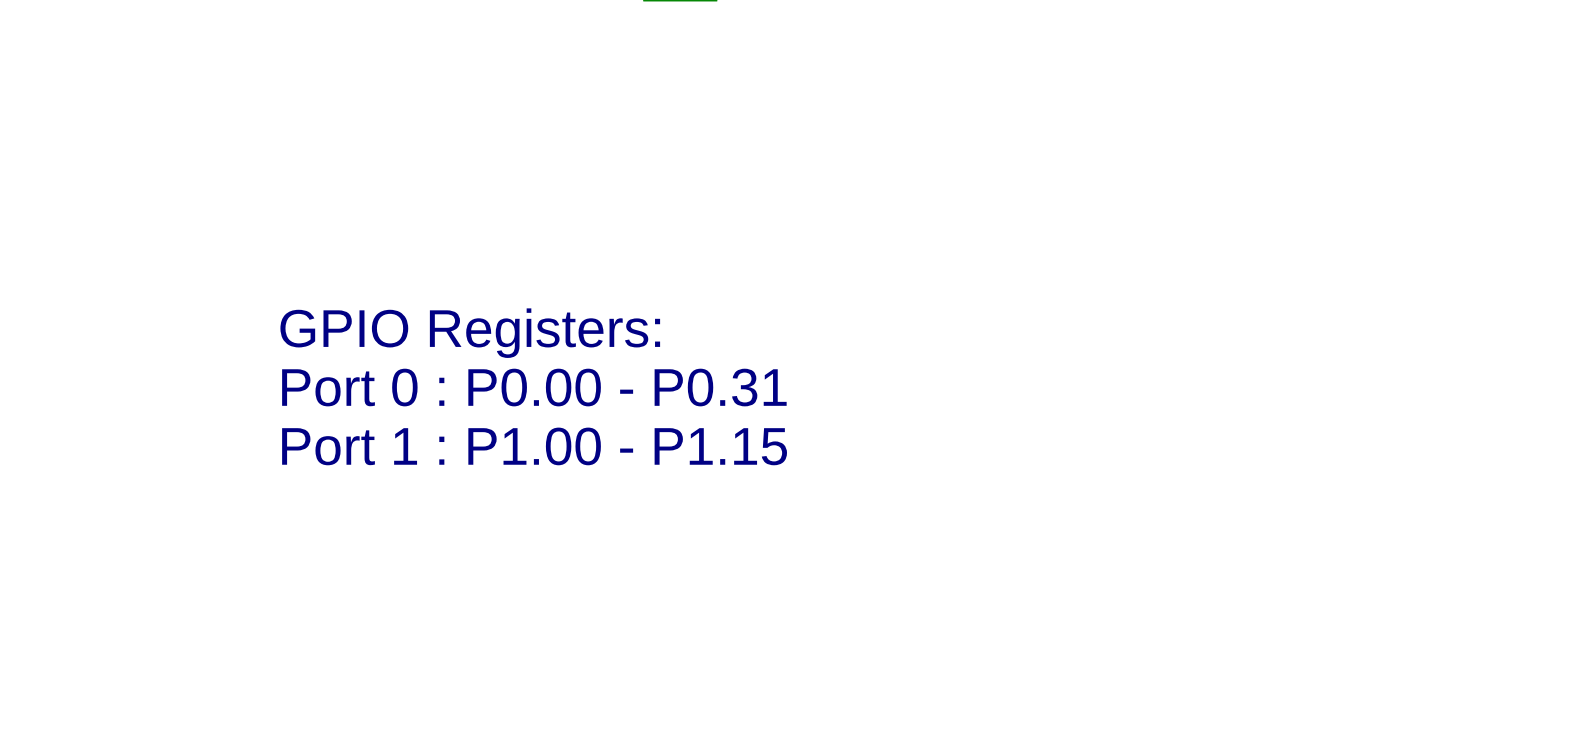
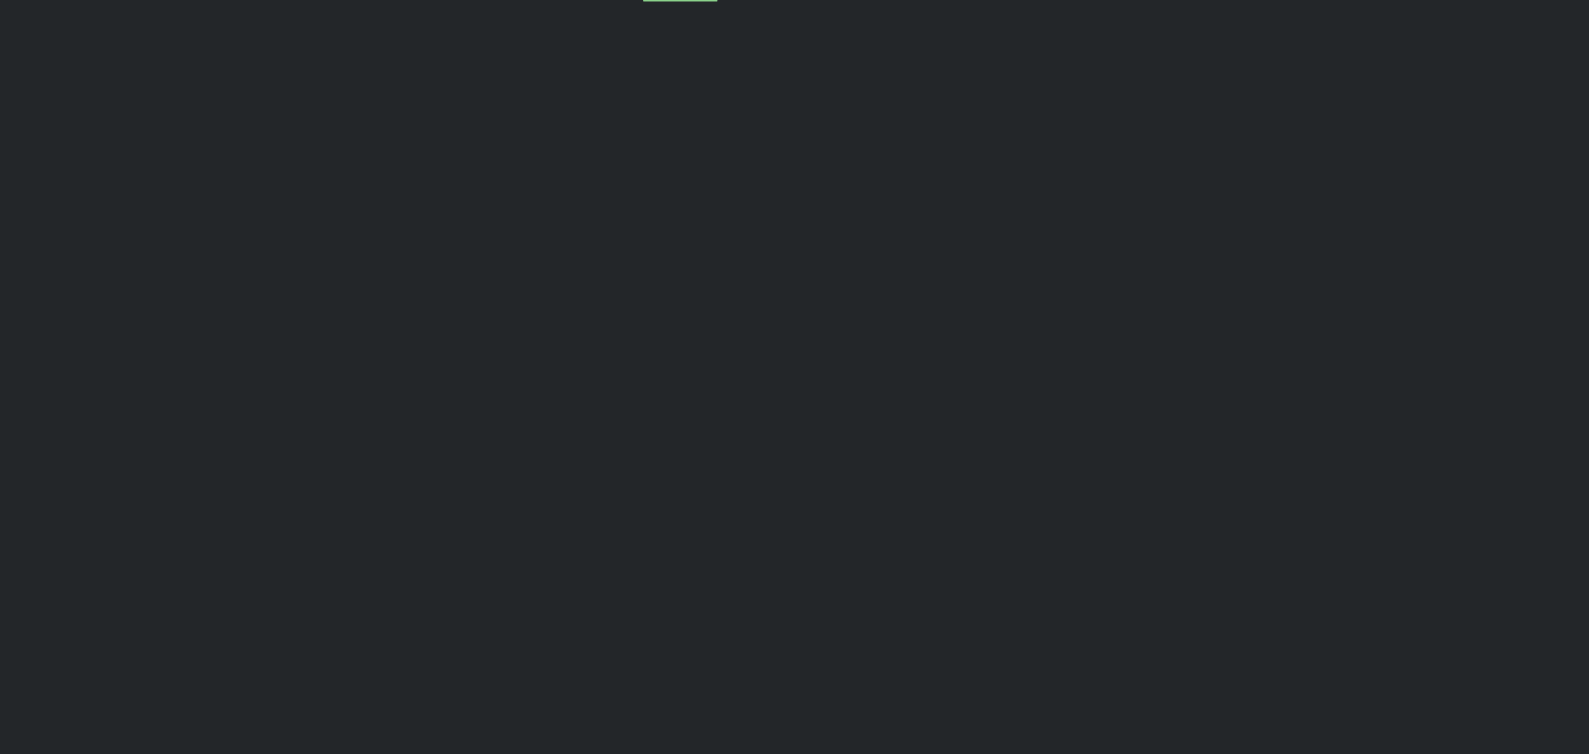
text: GPIO Registers: (470, 333) -> none
text: Port 0 : P0.00 - P0.31 (534, 387) -> none
text: Port 1 : P1.00 - P1.15 (534, 446) -> none

